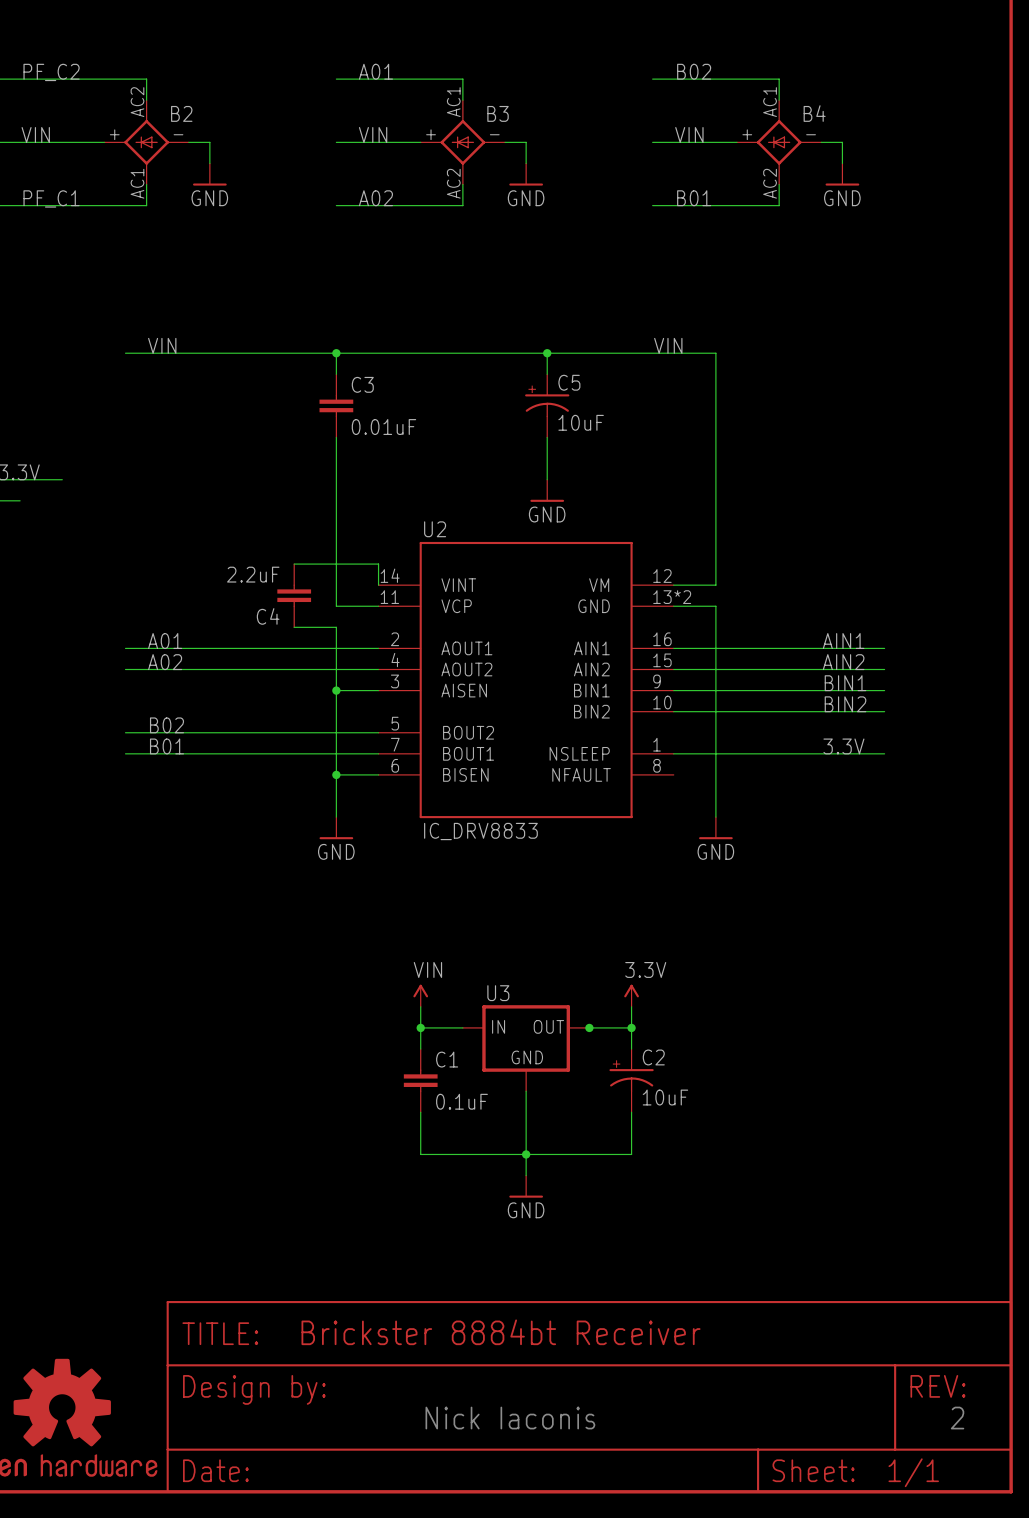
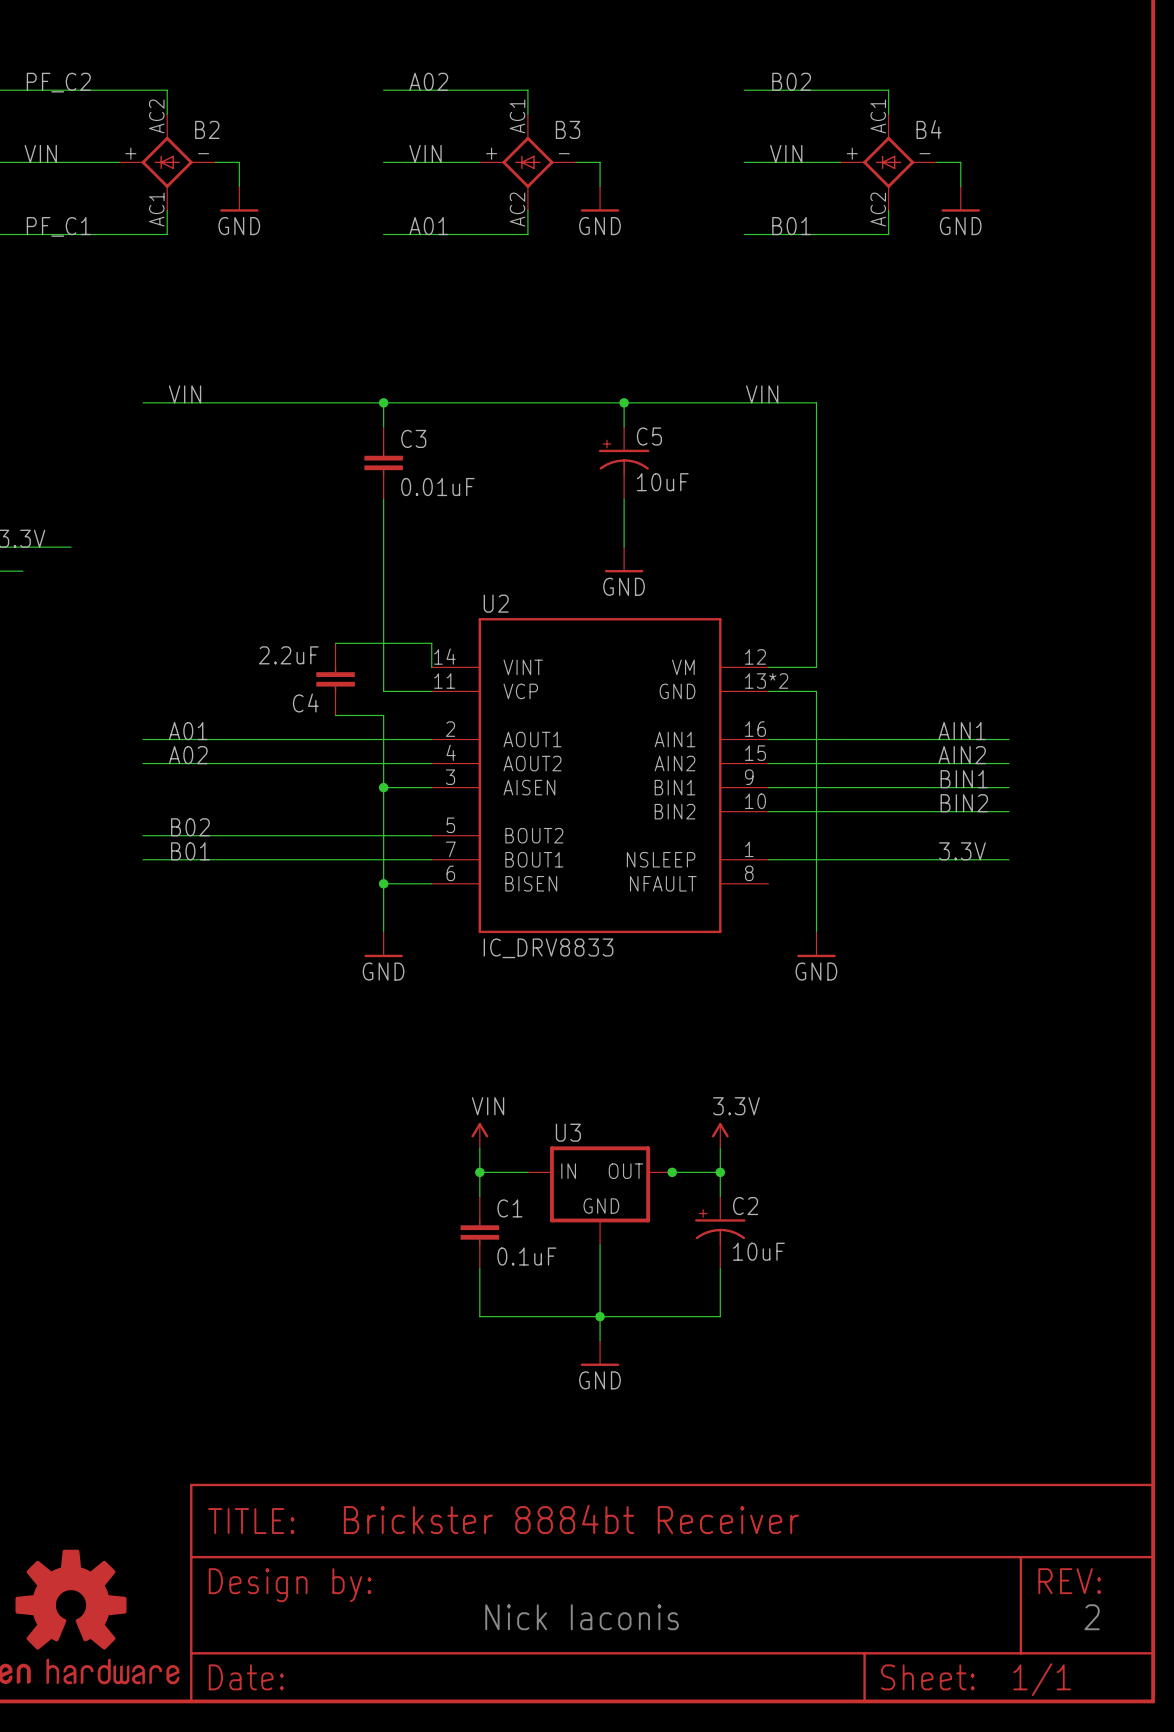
label: A01 (375, 71) -> A02 (428, 81)
label: A02 (375, 198) -> A01 (428, 226)

